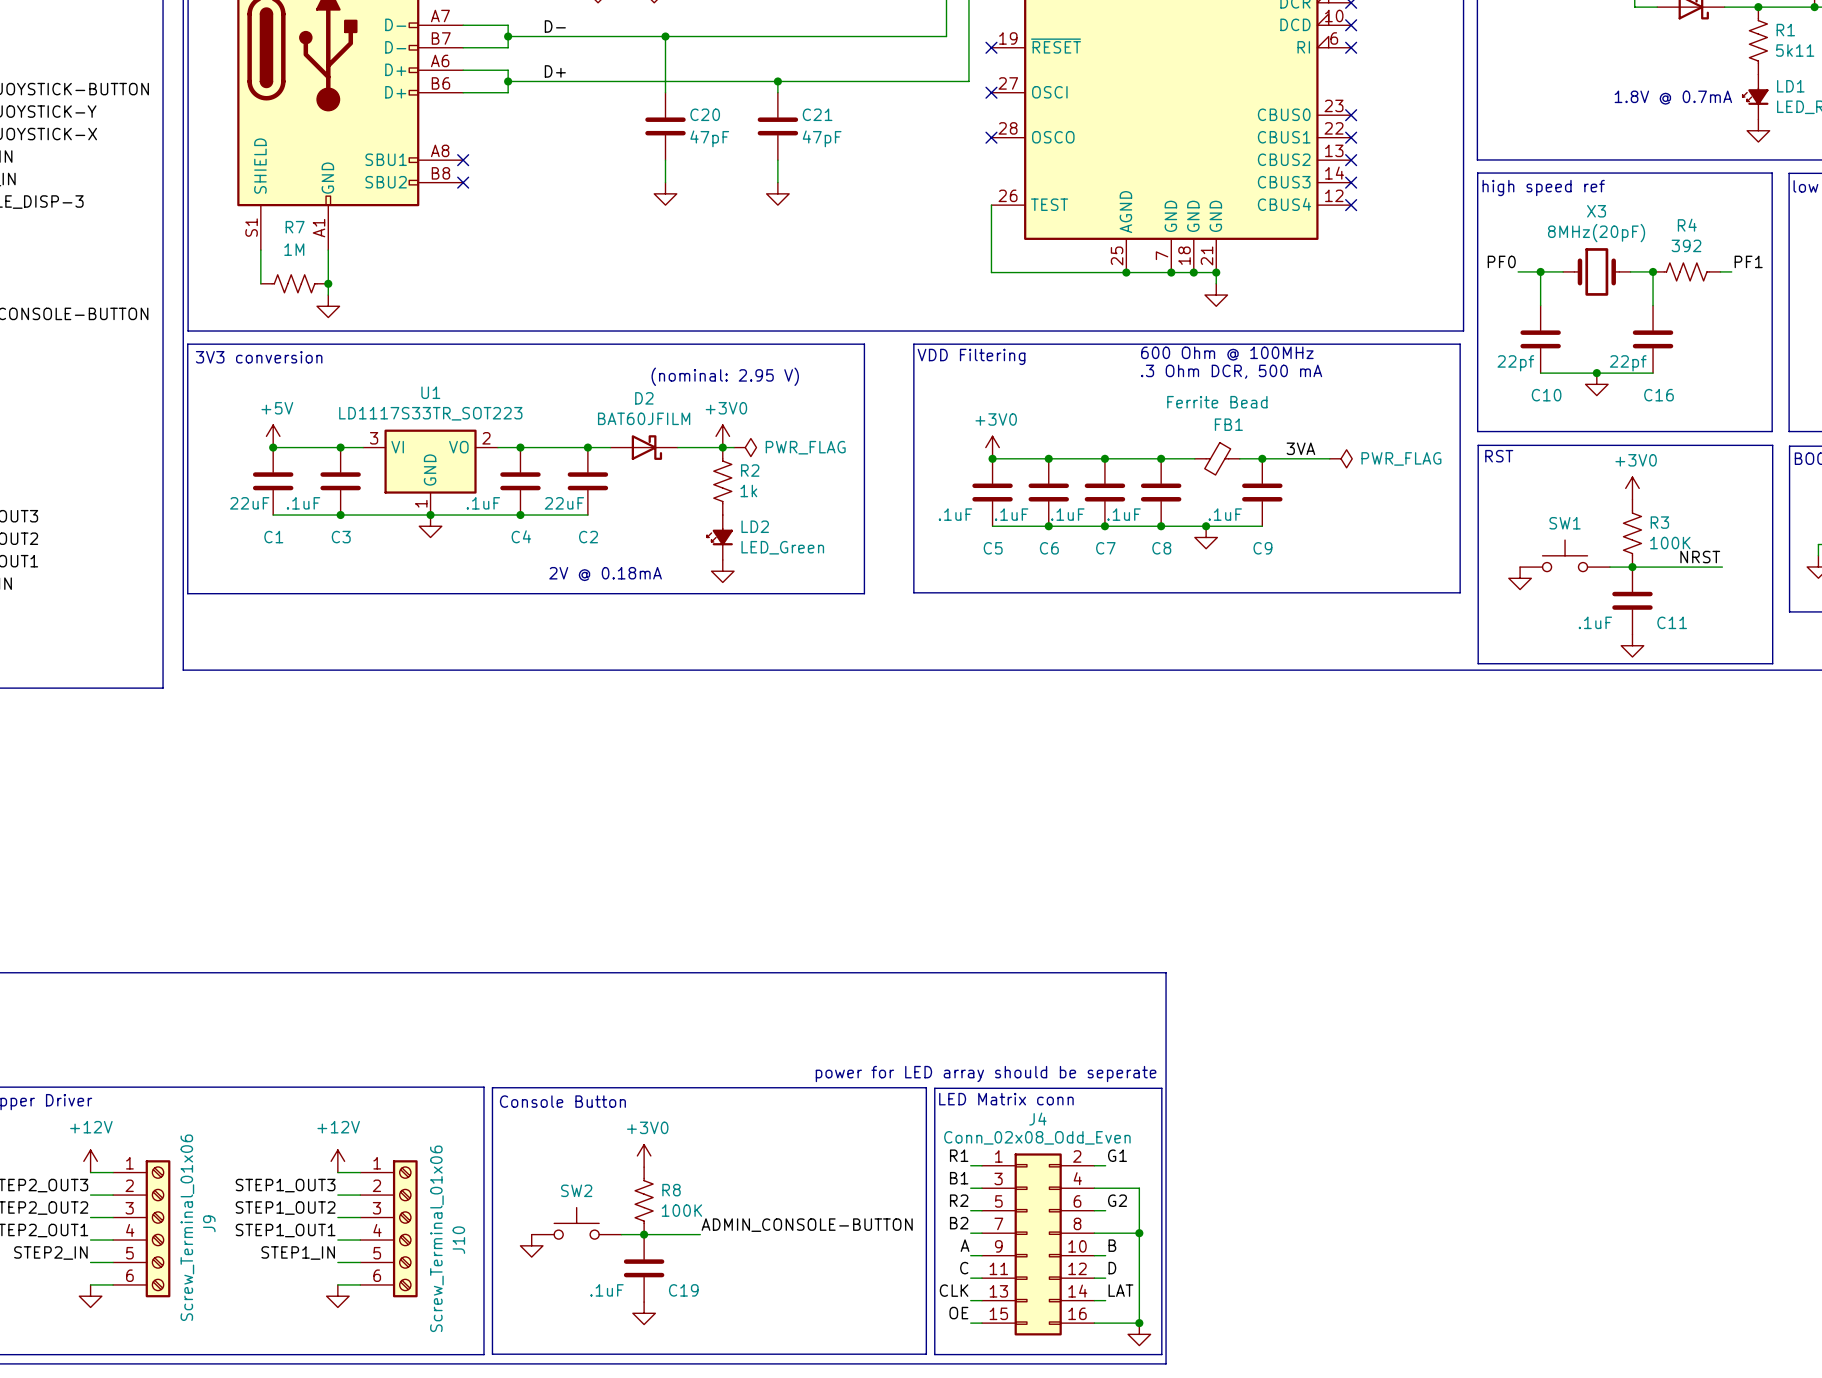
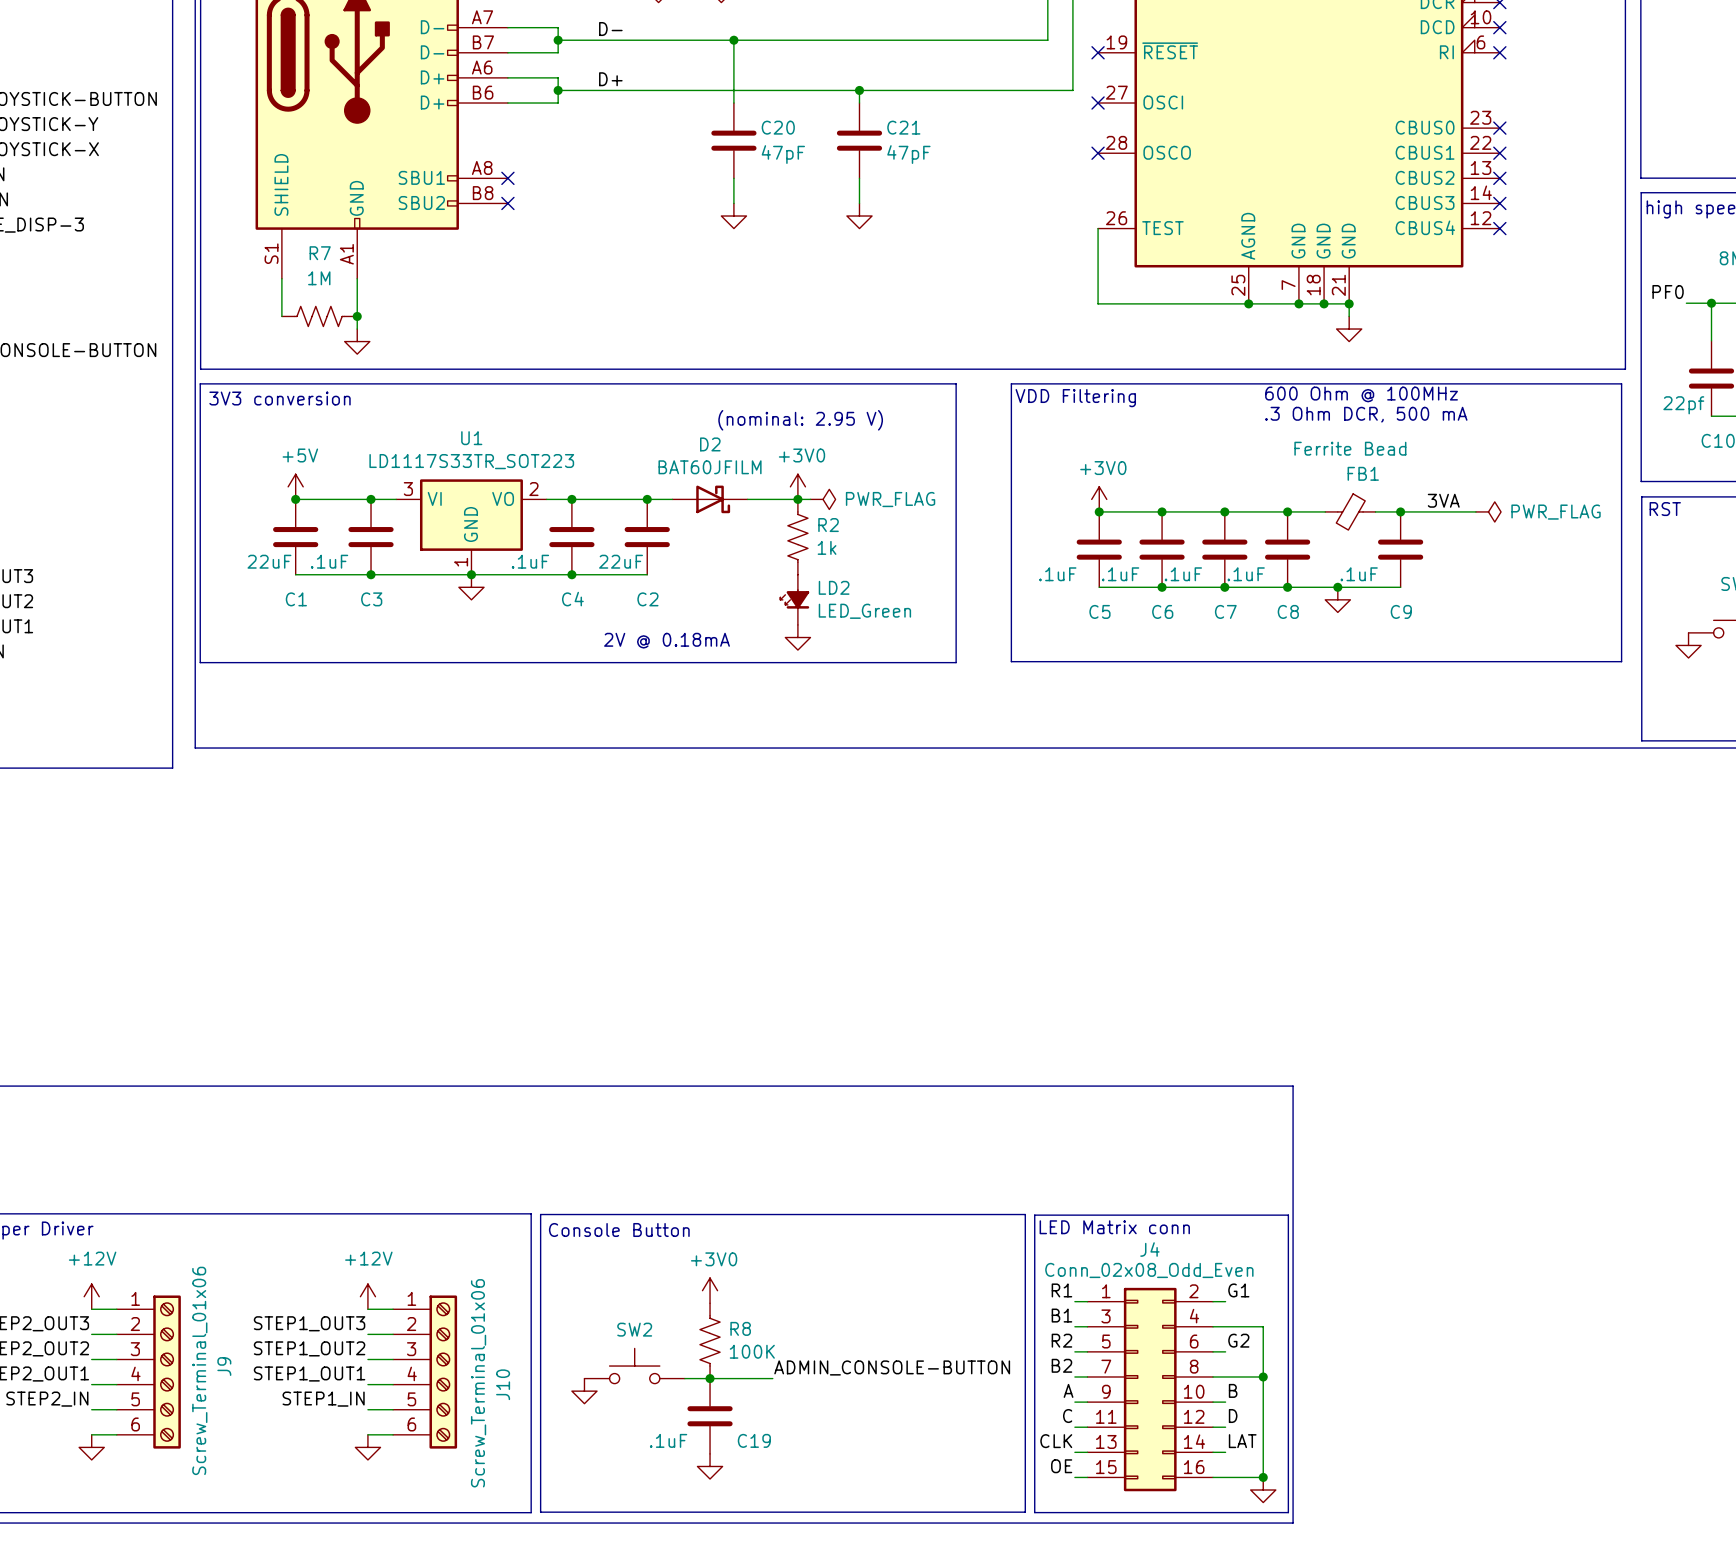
text: power for LED array should be seperate (986, 1074) -> none

